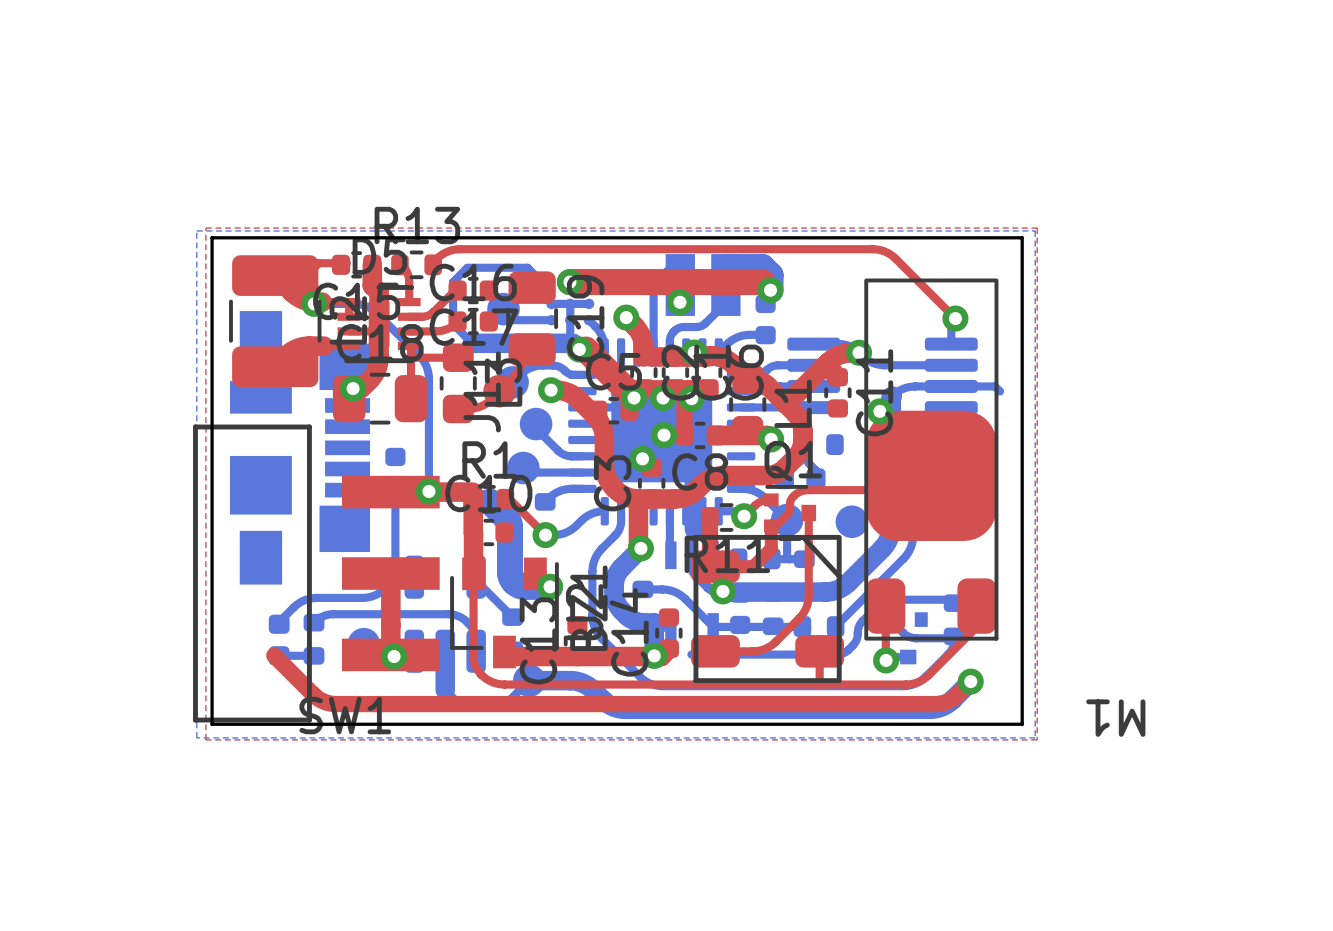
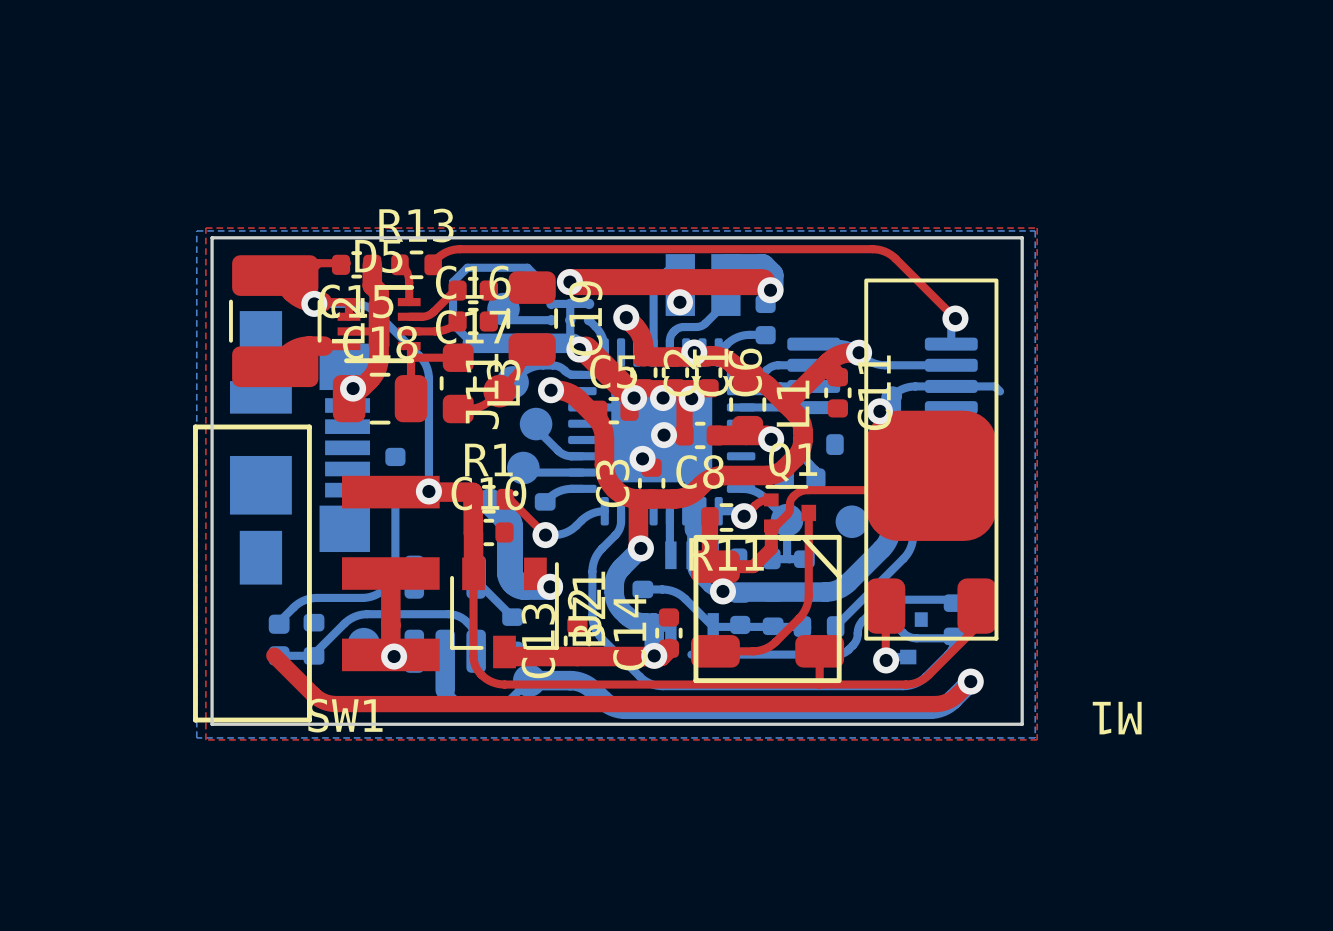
bottom track: (367, 614) (328, 614) (314, 622) -> (367, 614) (354, 616) (346, 621) (313, 654)

